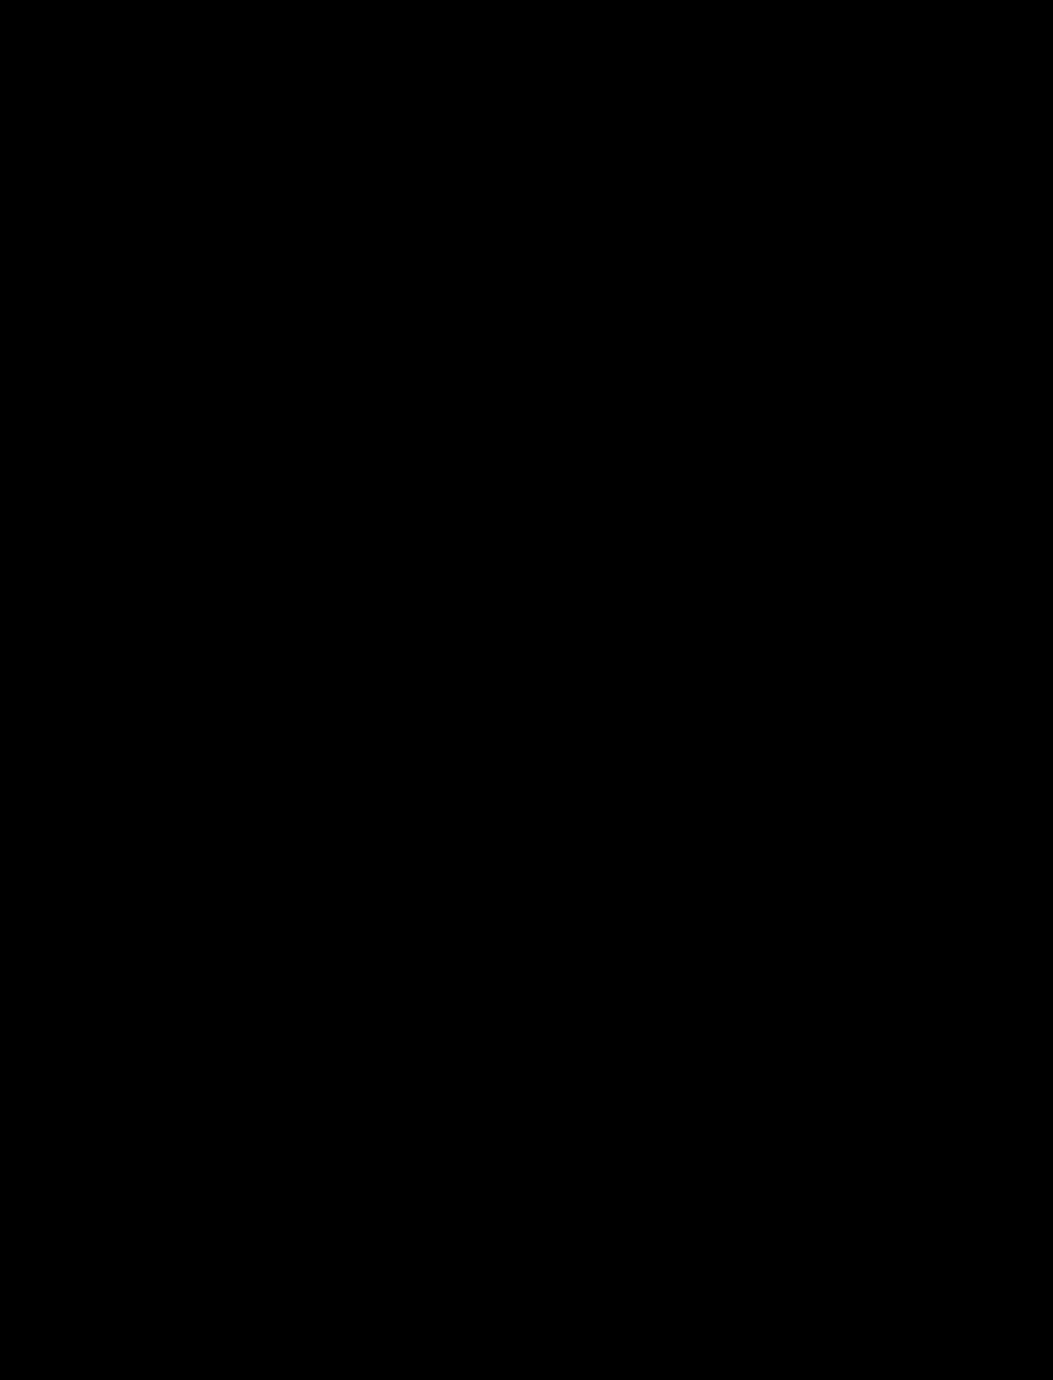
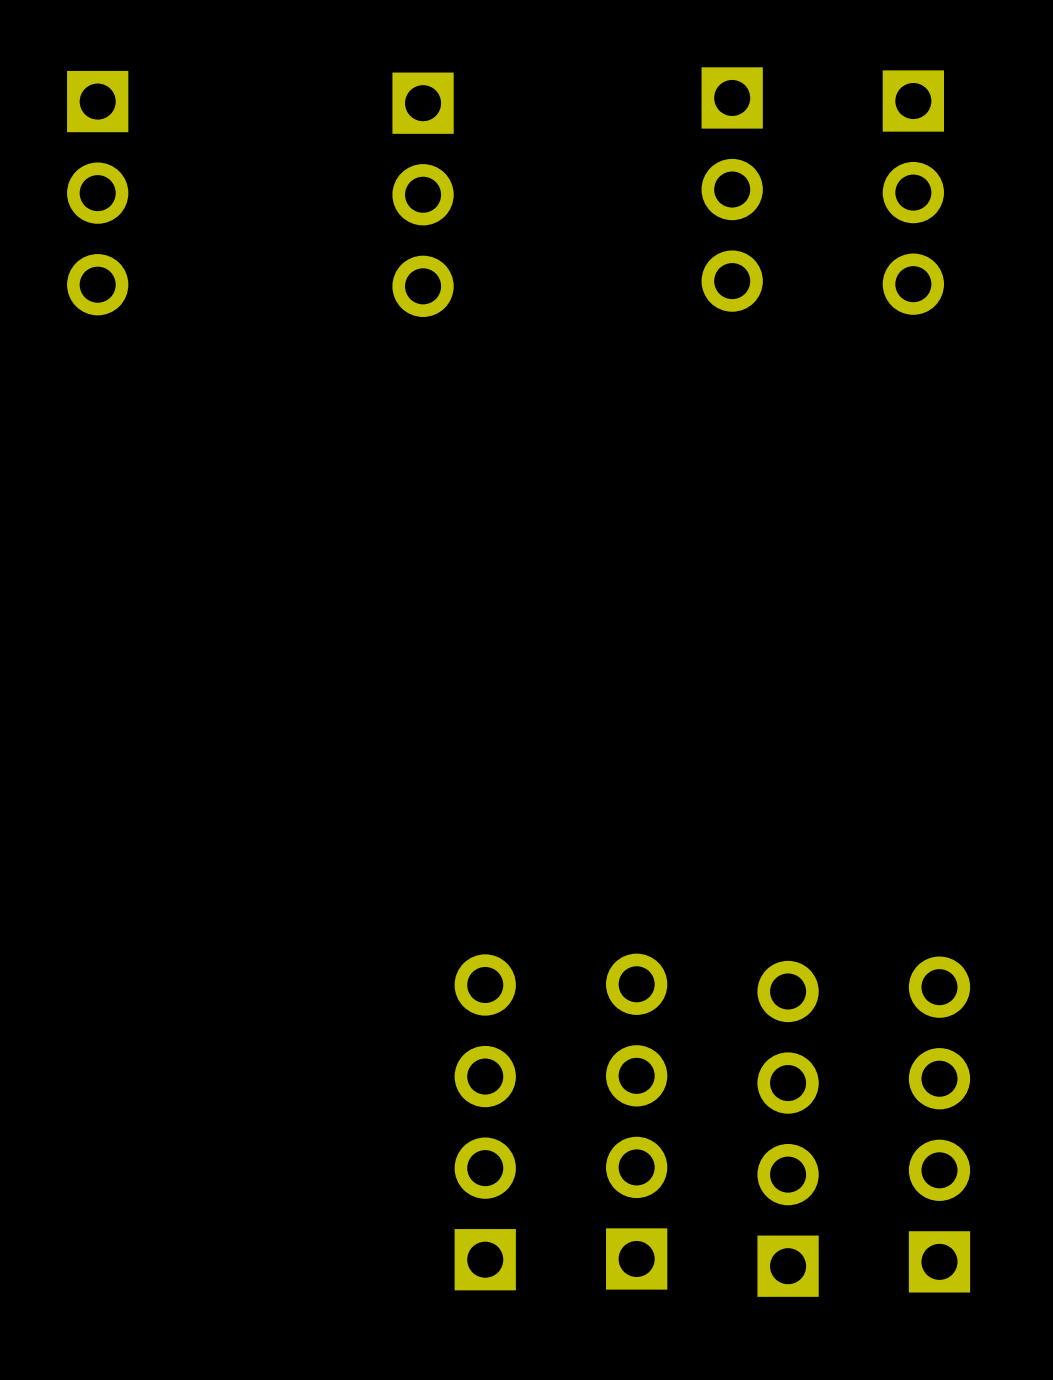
part: none -> (732, 189)
part: none -> (913, 192)
part: none -> (97, 193)
part: none -> (423, 194)
part: none -> (636, 1121)
part: none -> (485, 1122)
part: none -> (939, 1124)
part: none -> (788, 1128)

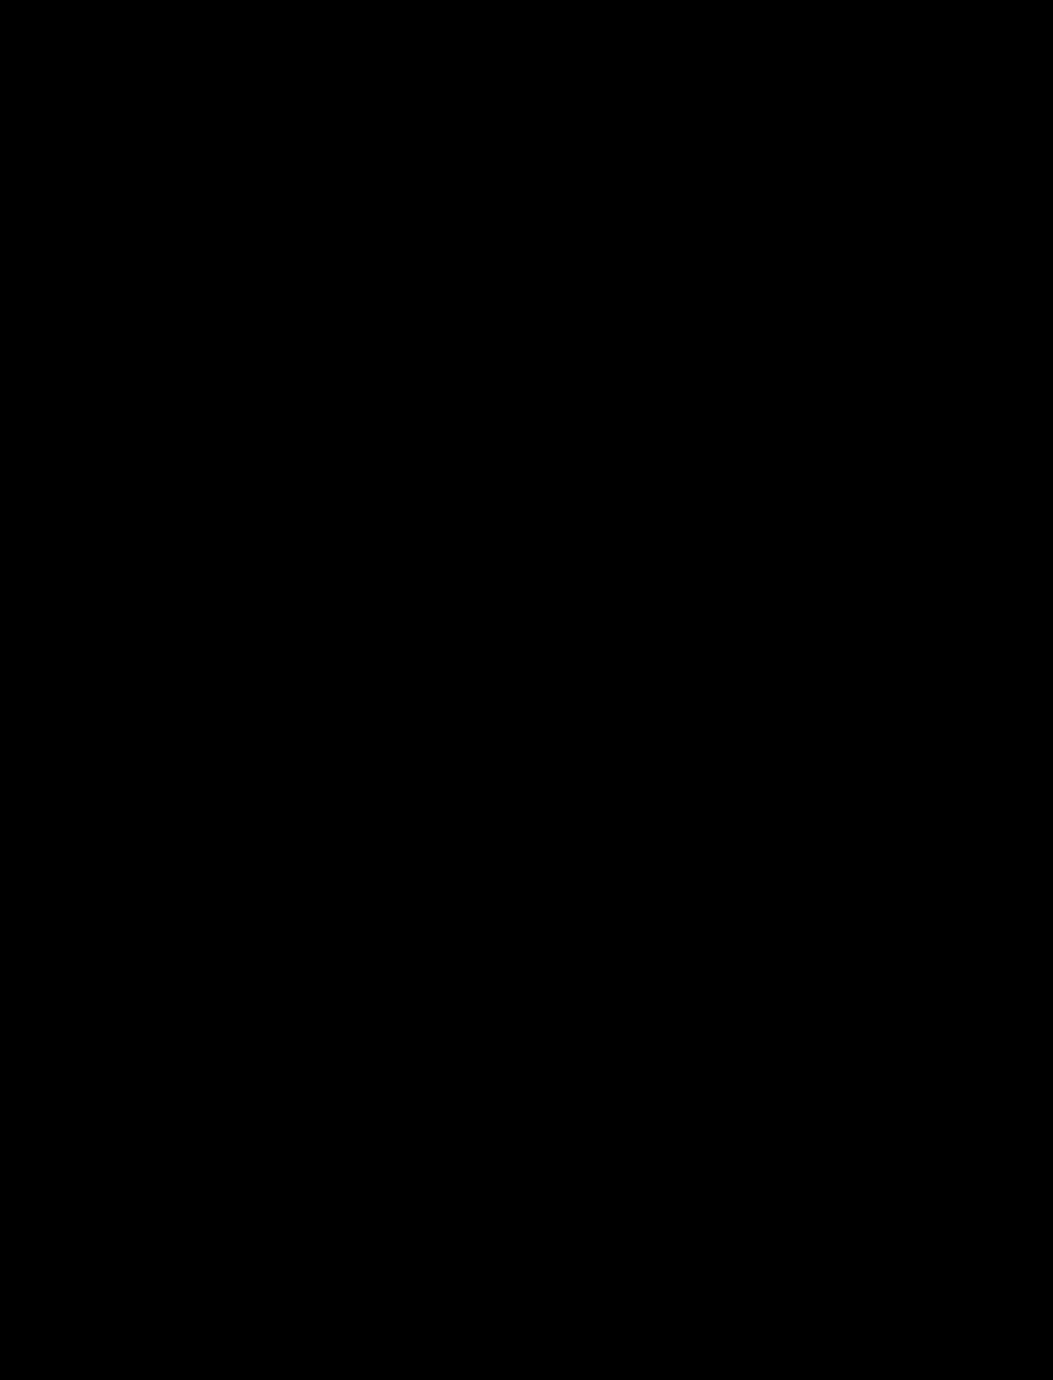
part: (732, 189) -> none
part: (913, 192) -> none
part: (97, 193) -> none
part: (423, 194) -> none
part: (636, 1121) -> none
part: (485, 1122) -> none
part: (939, 1124) -> none
part: (788, 1128) -> none

